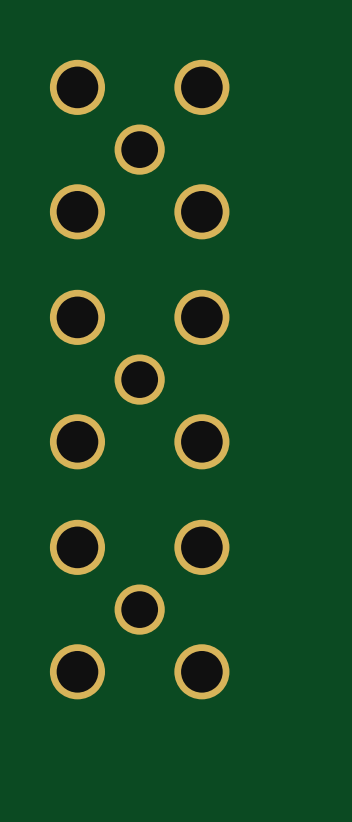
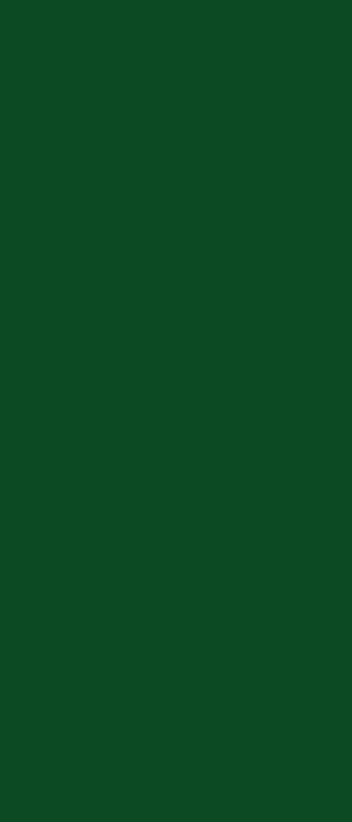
part: (139, 149) -> none
part: (139, 379) -> none
part: (139, 609) -> none

